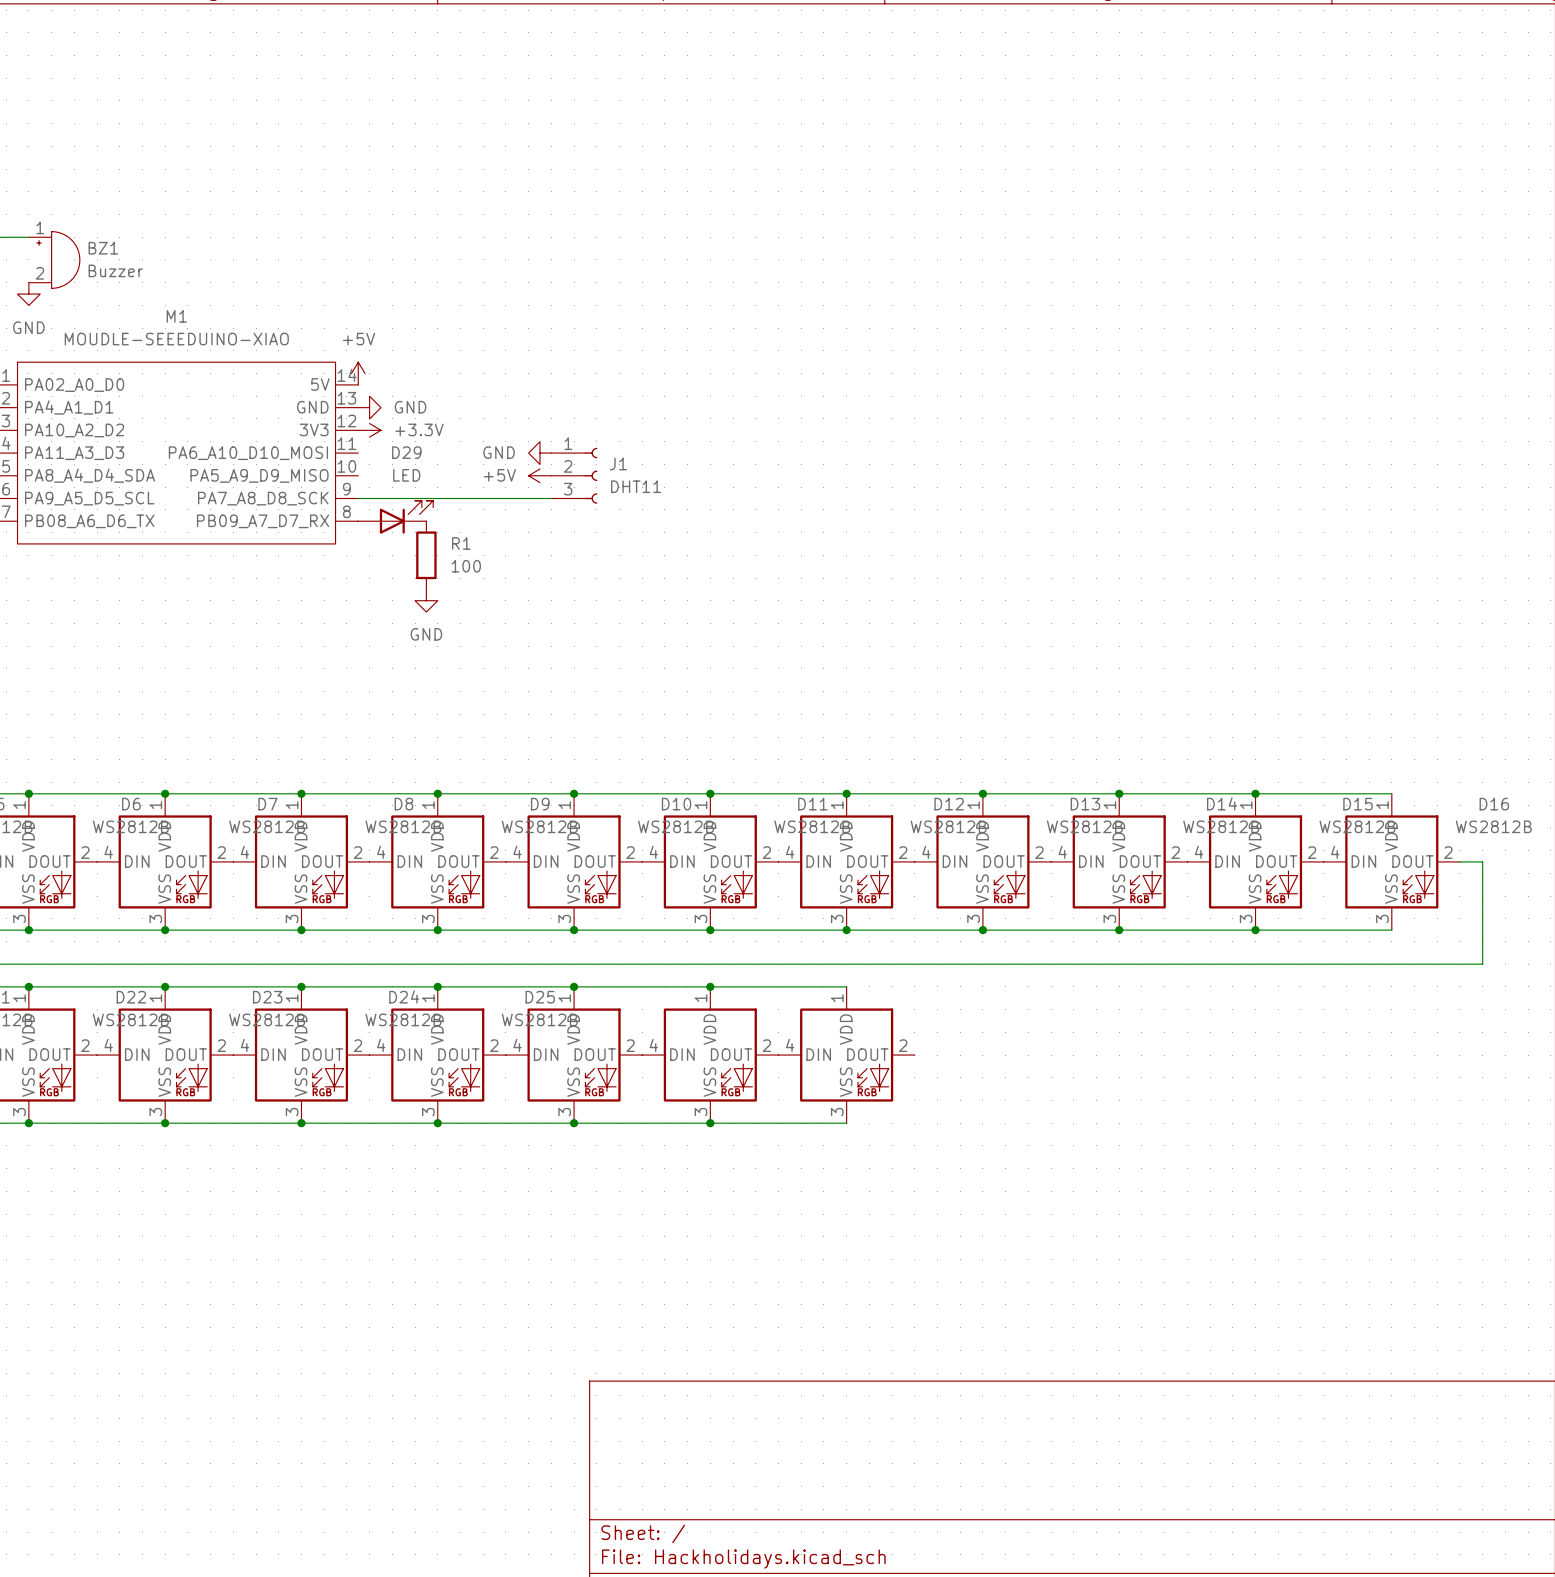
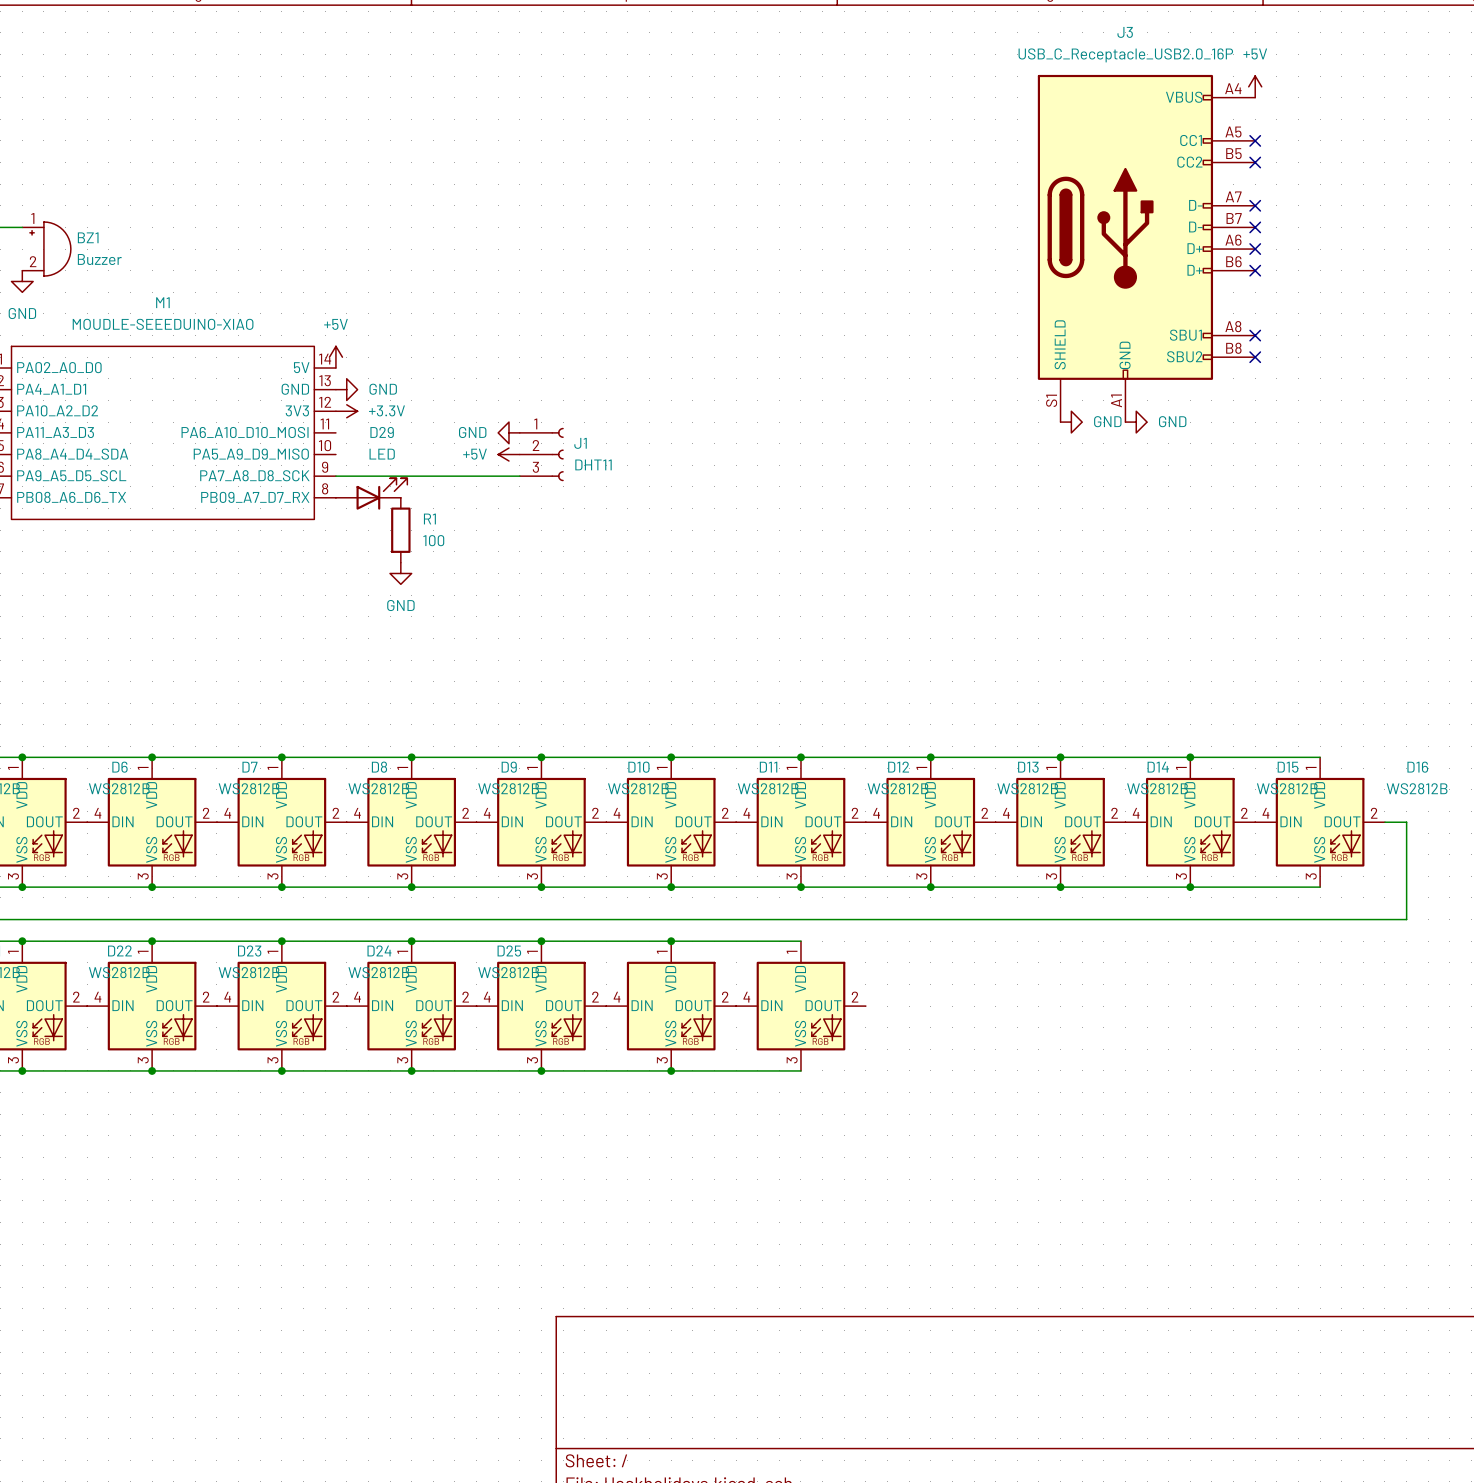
power symbol: none -> +5V (1255, 86)
no-connect mark: none -> (1255, 140)
no-connect mark: none -> (1255, 162)
no-connect mark: none -> (1255, 205)
no-connect mark: none -> (1255, 227)
J3: none -> USB_C_Receptacle_USB2.0_16P (1146, 248)
no-connect mark: none -> (1255, 249)
no-connect mark: none -> (1255, 270)
no-connect mark: none -> (1255, 335)
no-connect mark: none -> (1255, 357)
power symbol: none -> GND (1071, 422)
power symbol: none -> GND (1136, 422)

